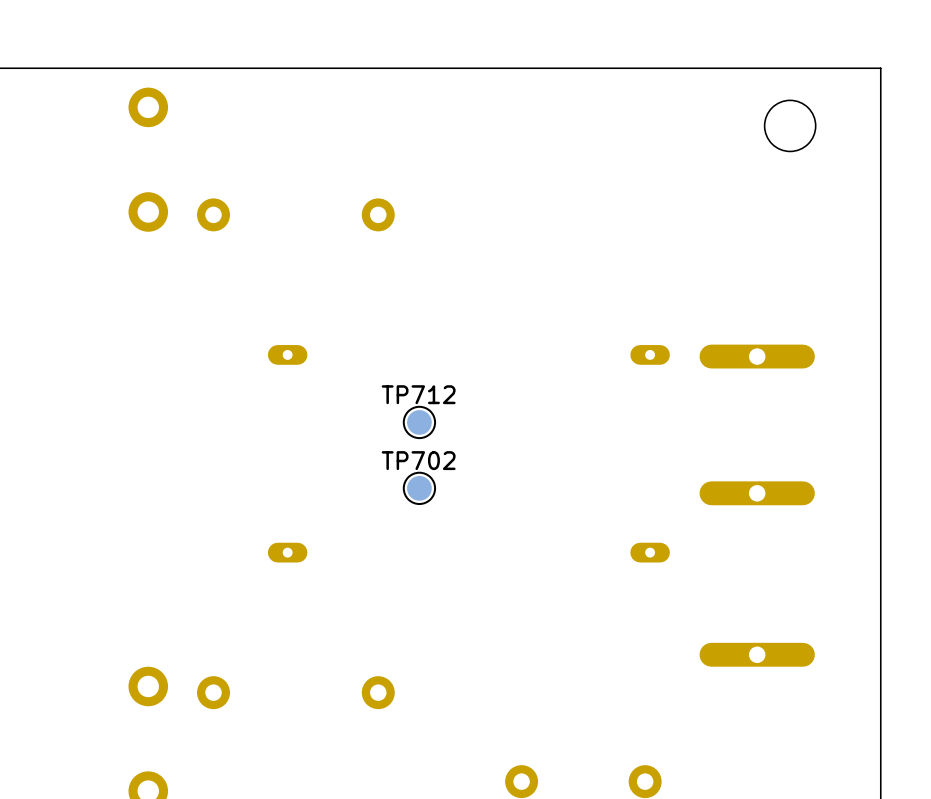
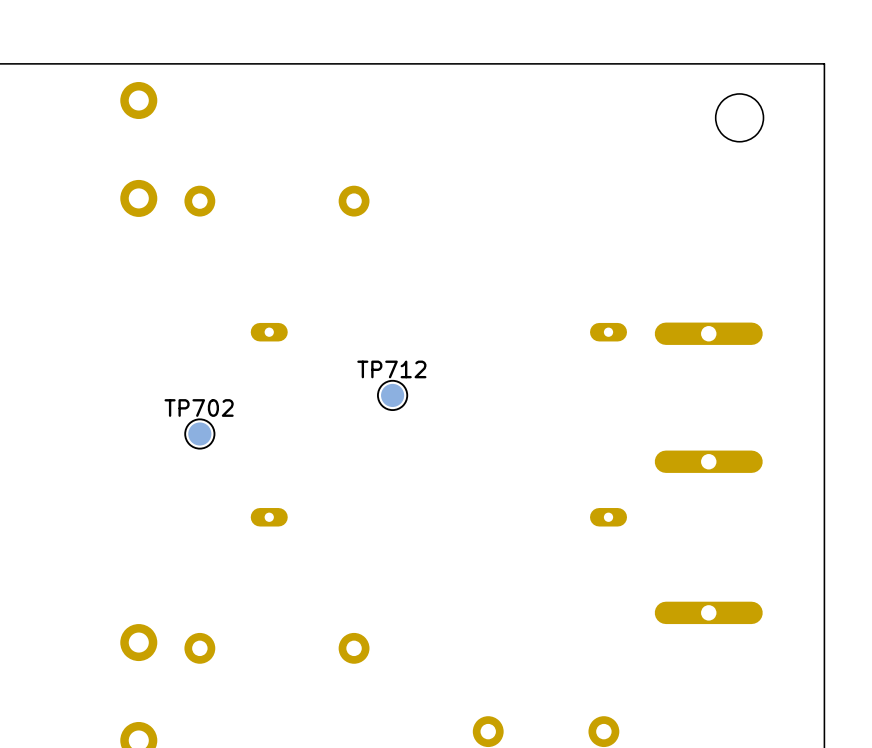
TP702 position: (419, 488) -> (199, 433)

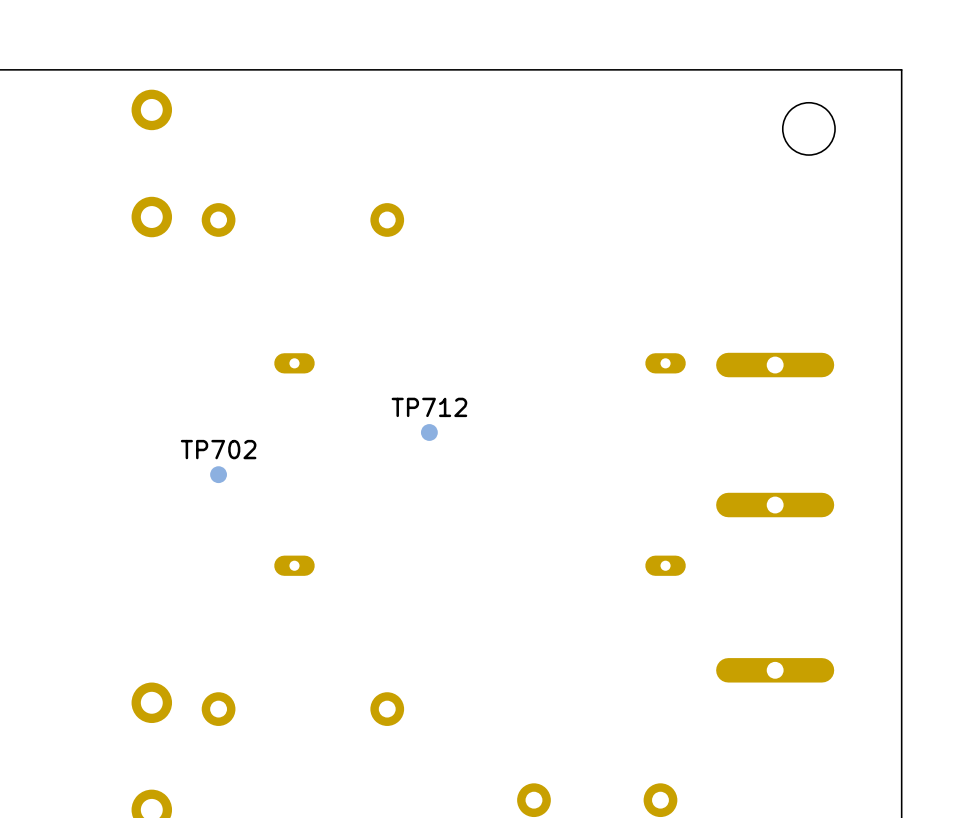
TP712 footprint: [377, 379, 409, 412] -> [420, 424, 438, 441]
TP702 footprint: [184, 418, 216, 450] -> [210, 466, 227, 484]

